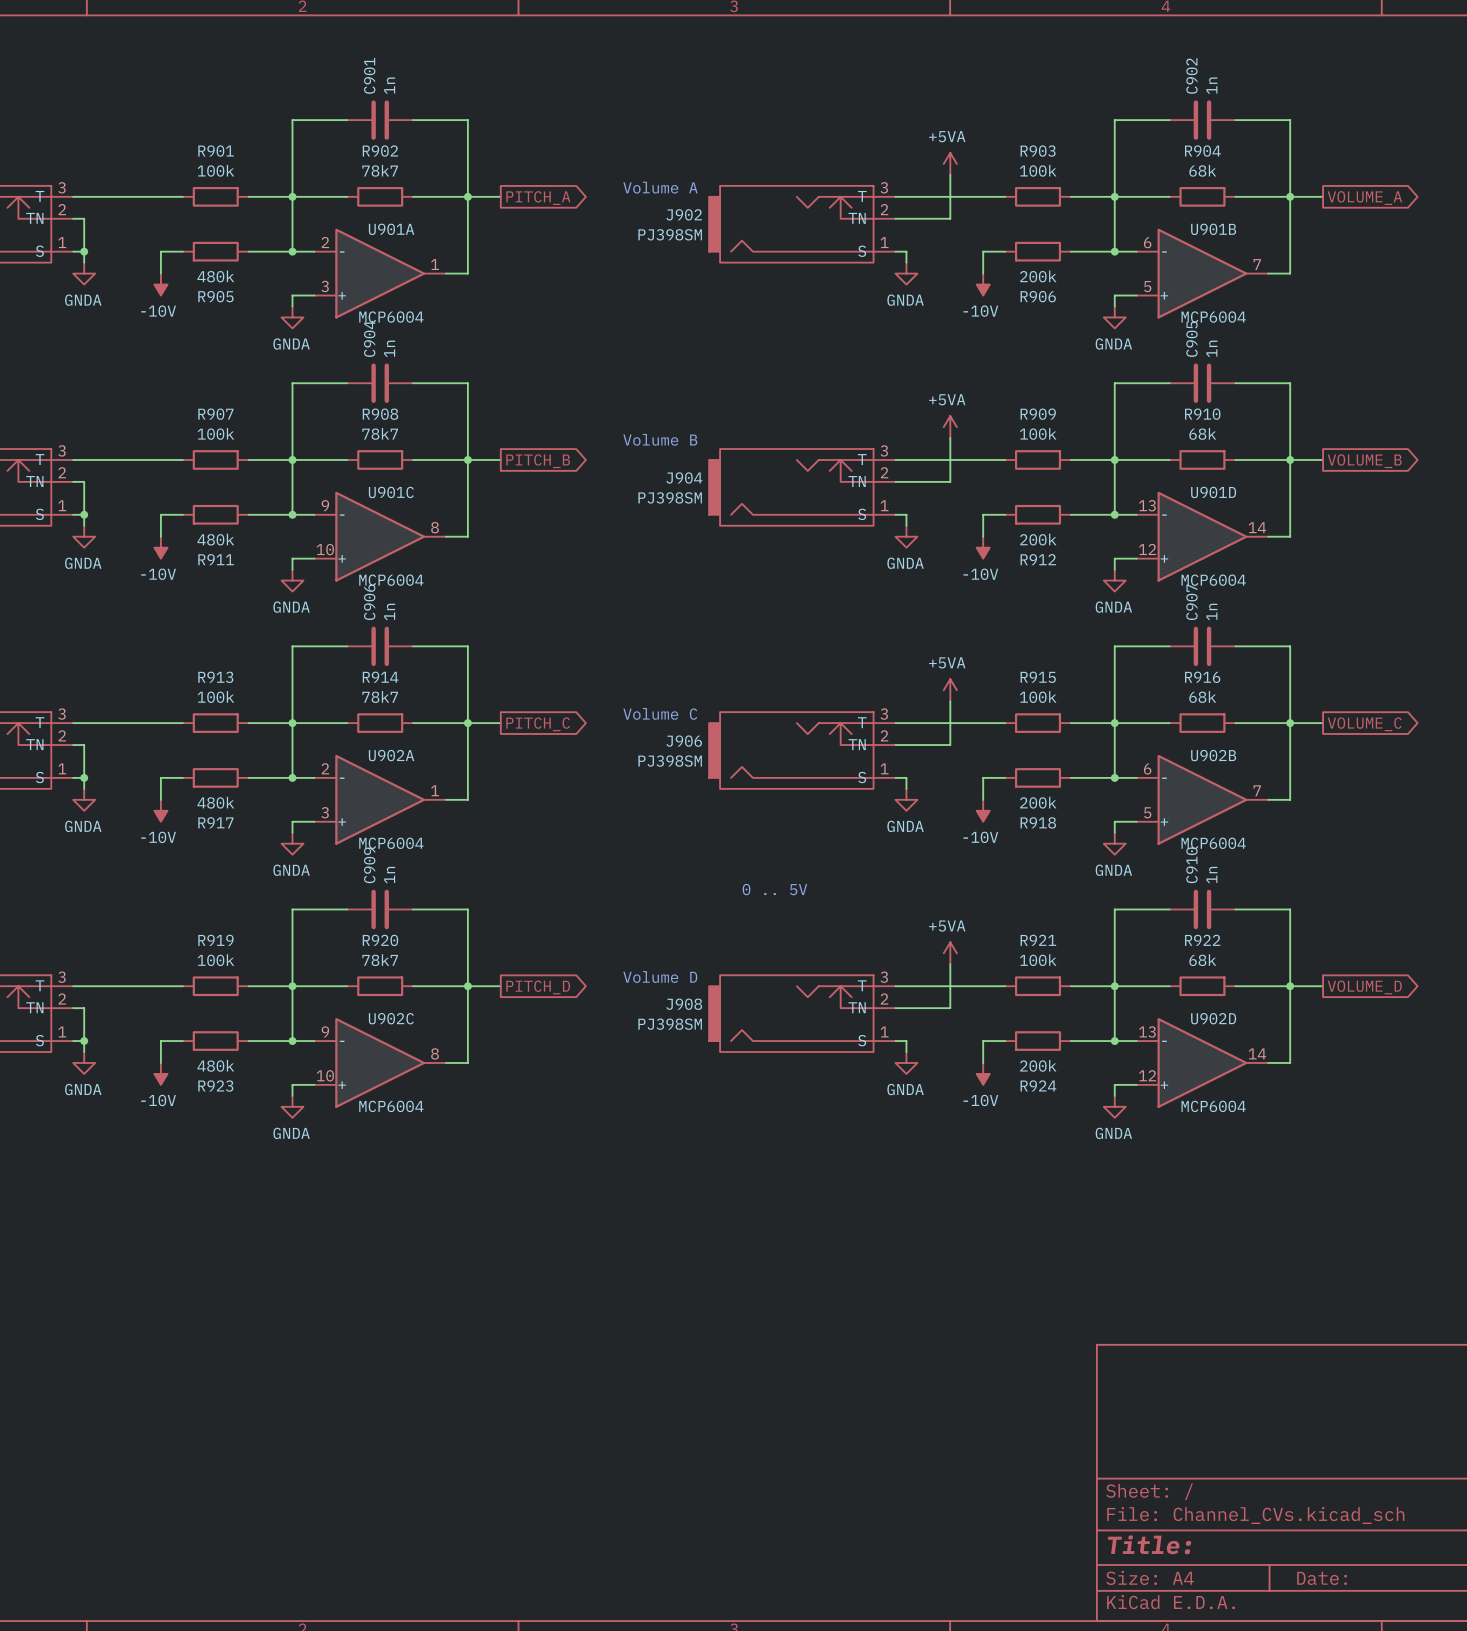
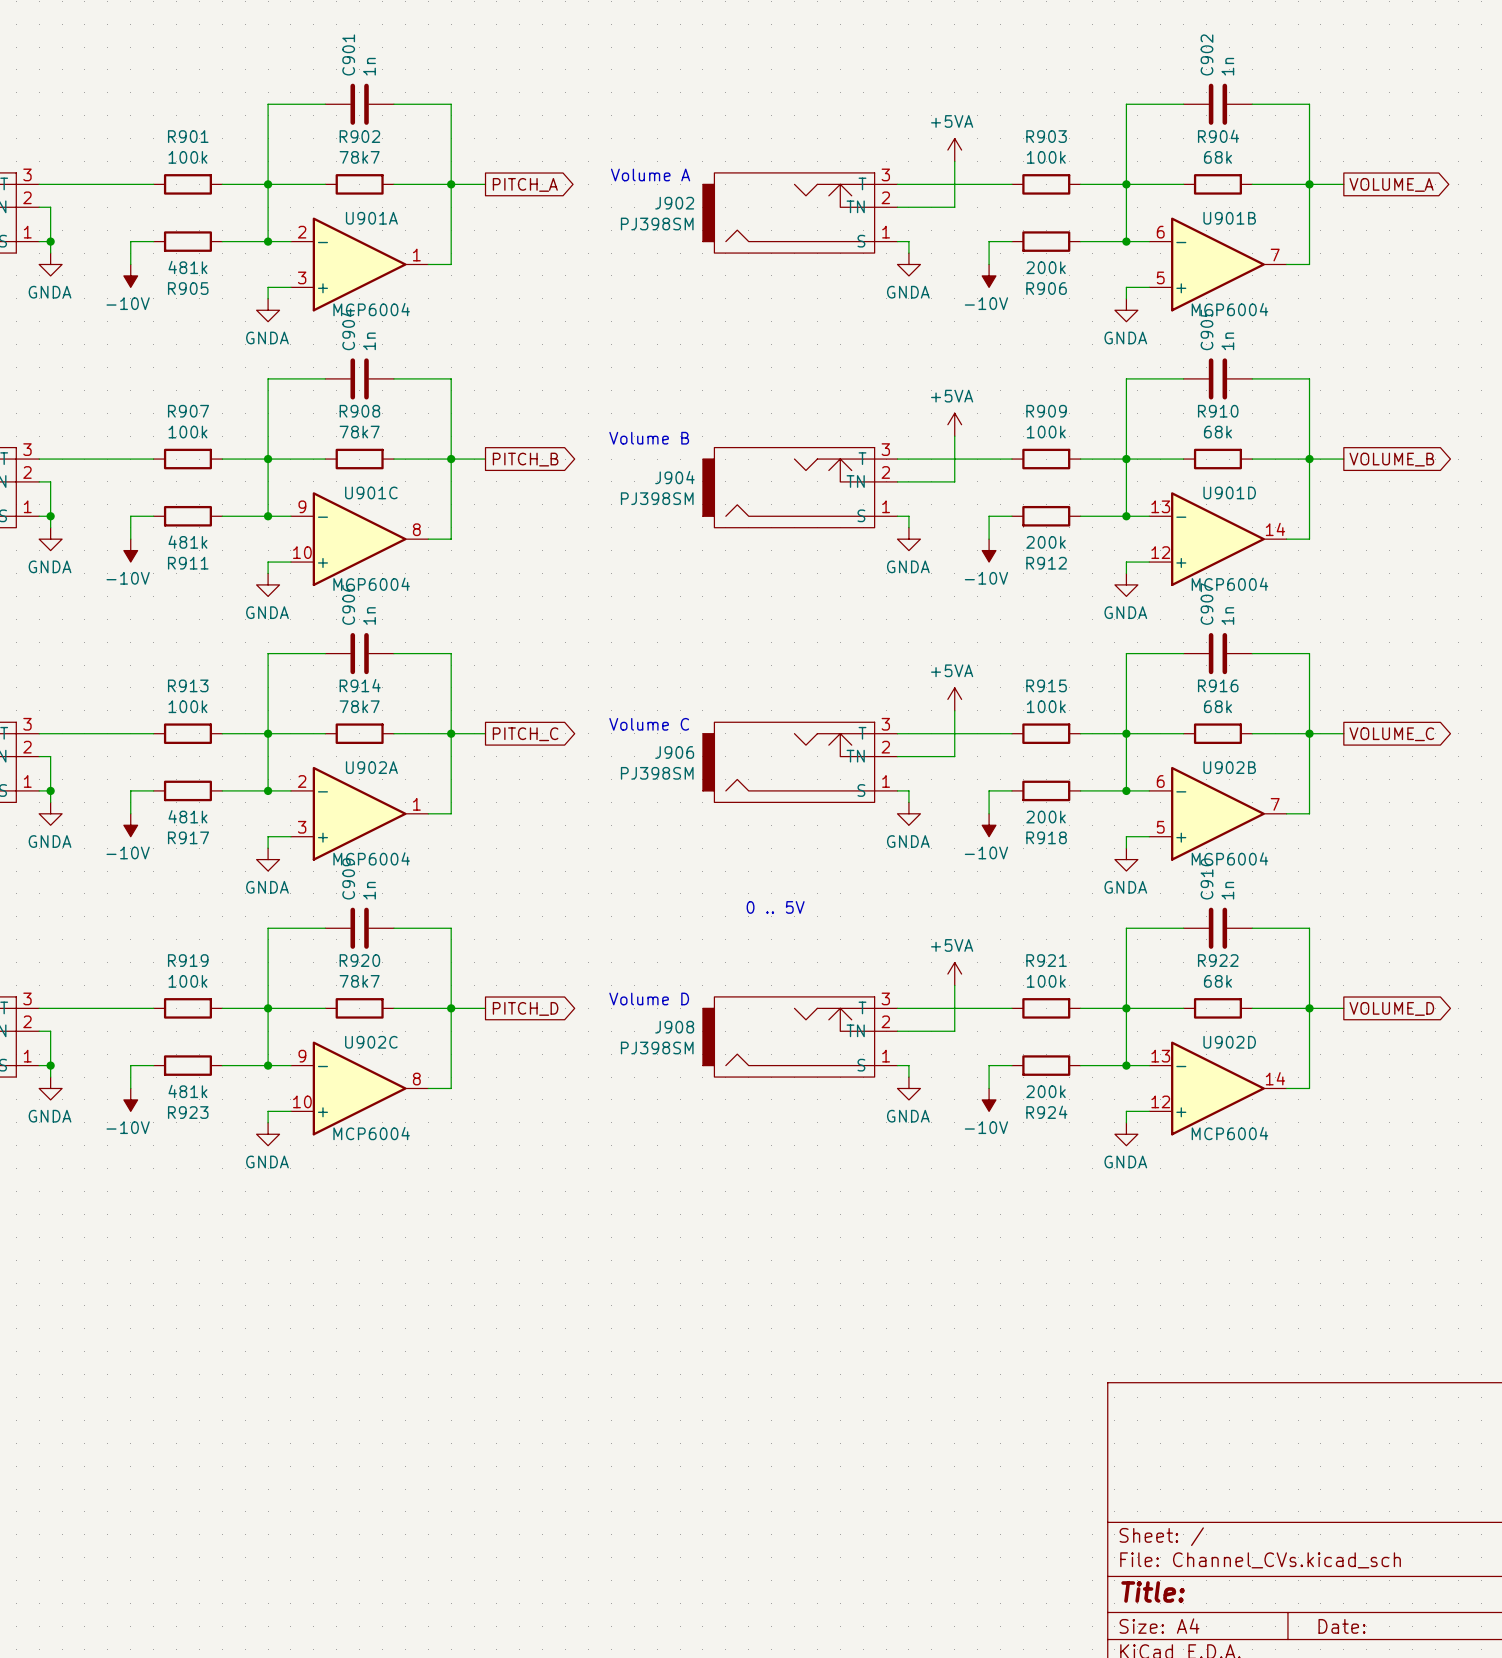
R905 value: 480k (215, 276) -> 481k (187, 267)
R911 value: 480k (215, 539) -> 481k (187, 542)
R917 value: 480k (215, 802) -> 481k (187, 816)
R923 value: 480k (215, 1065) -> 481k (187, 1091)

